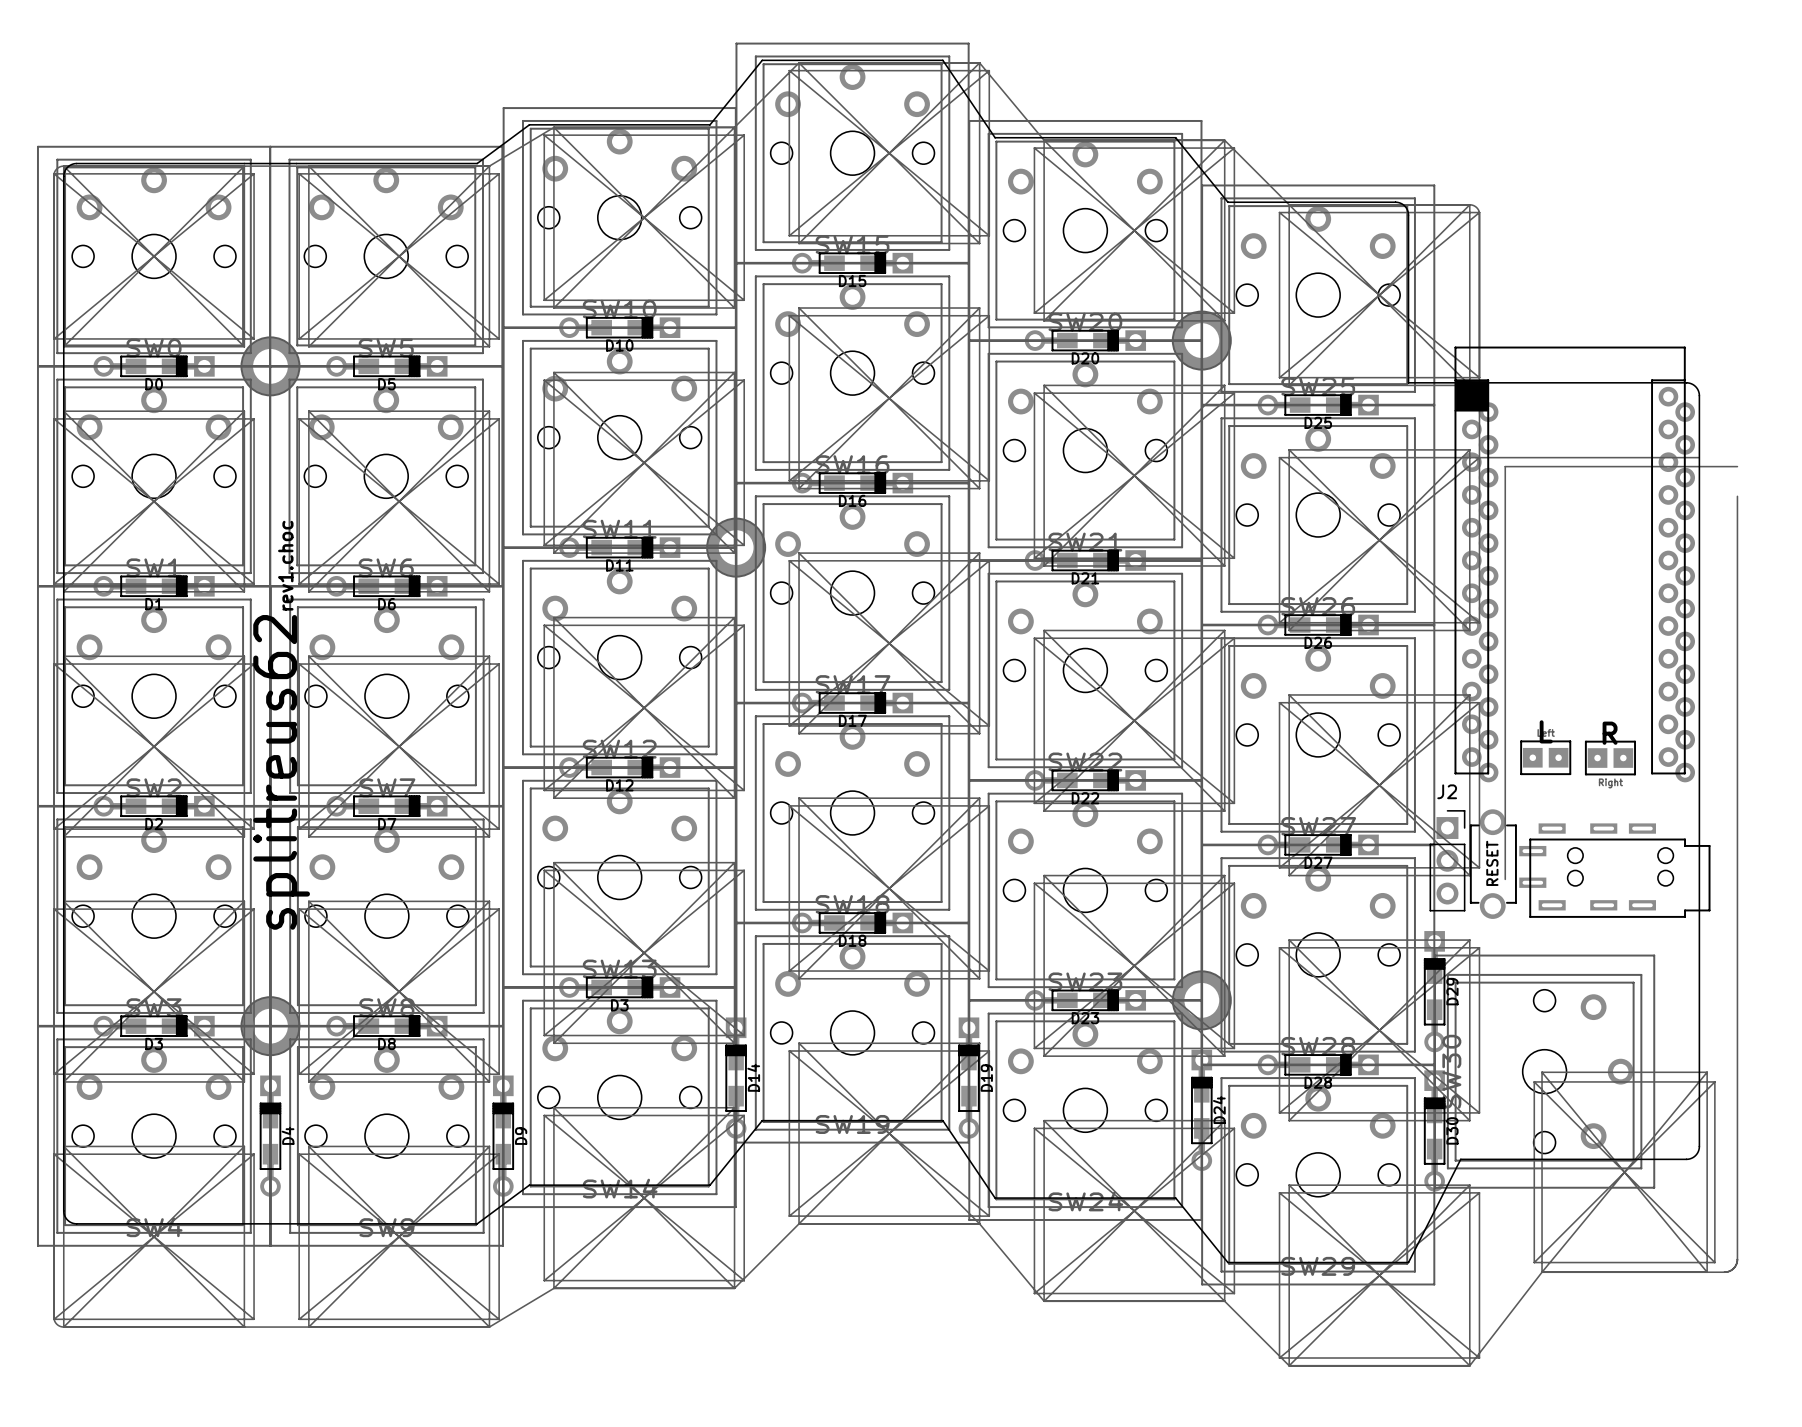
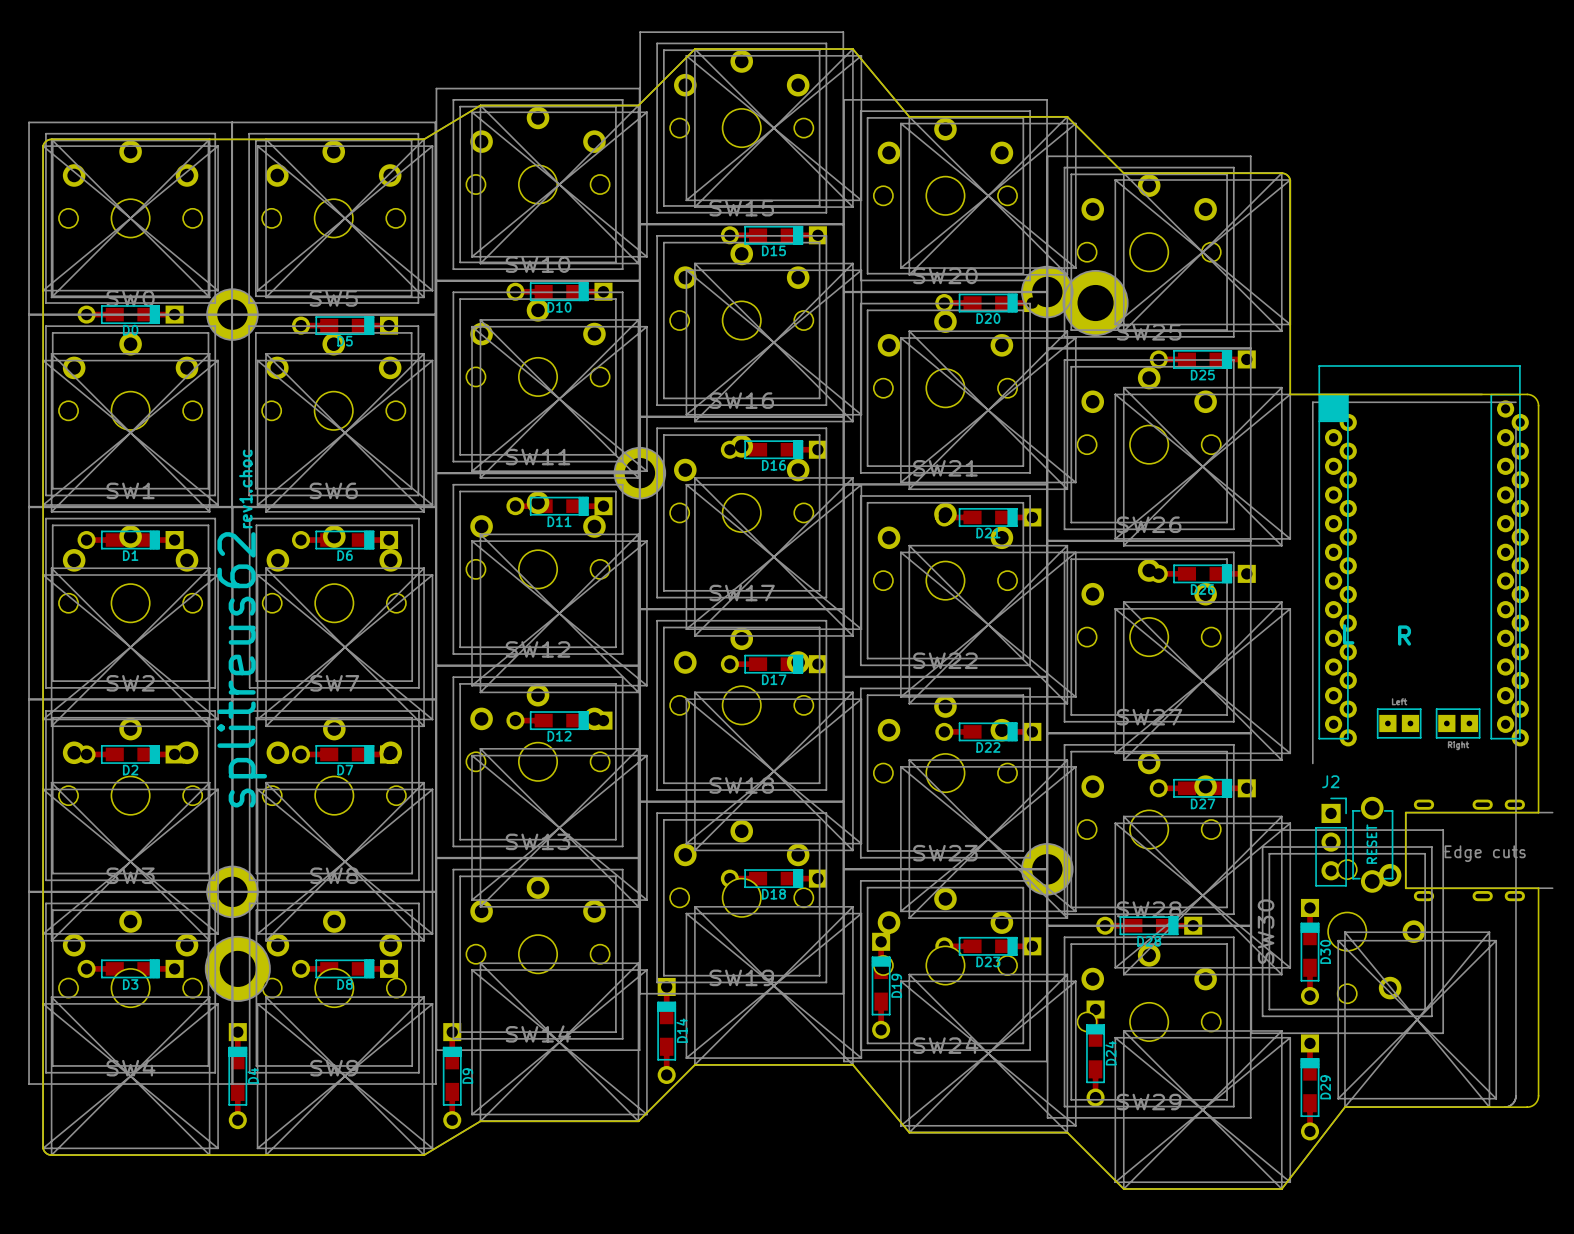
board edge: (762, 60) (710, 124) (529, 124) (477, 163) (76, 163) (70, 165) (65, 169) (63, 176) (63, 1210) (66, 1218) (76, 1223) (477, 1223) (529, 1185) (710, 1185) (762, 1120) (942, 1120) (995, 1198) (1175, 1198) (1227, 1262) (1408, 1262) (1460, 1159) (1686, 1159) (1694, 1156) (1699, 1146) (1699, 395) (1696, 387) (1686, 382) (1408, 382) (1408, 215) (1406, 208) (1402, 203) (1395, 202) (1227, 202) (1175, 137) (995, 137) (942, 60) (762, 60) -> (694, 49) (638, 105) (480, 105) (424, 139) (51, 139) (44, 143) (43, 1148) (44, 1151) (51, 1155) (424, 1155) (480, 1121) (638, 1121) (694, 1064) (852, 1064) (909, 1132) (1067, 1132) (1123, 1188) (1281, 1188) (1344, 1107) (1527, 1107) (1534, 1104) (1538, 1095) (1538, 888) (1405, 888) (1405, 812) (1538, 812) (1538, 405) (1536, 398) (1527, 394) (1290, 394) (1290, 180) (1285, 174) (1123, 173) (1067, 116) (909, 116) (852, 49) (694, 49)
D15 position: (852, 263) -> (773, 235)
D10 position: (619, 327) -> (559, 291)
D20 position: (1085, 340) -> (988, 303)
part: none -> (1095, 303)
D5 position: (386, 366) -> (345, 325)
D25 position: (1318, 405) -> (1202, 359)
D16 position: (852, 483) -> (773, 449)
D11 position: (619, 547) -> (559, 506)
D21 position: (1085, 560) -> (988, 517)
part position: (1574, 564) -> (1423, 555)
D1 position: (154, 586) -> (130, 540)
D6 position: (386, 586) -> (345, 540)
D26 position: (1318, 625) -> (1202, 573)
D17 position: (852, 703) -> (773, 664)
part position: (1545, 757) -> (1399, 723)
part position: (1610, 758) -> (1458, 723)
D12 position: (619, 767) -> (559, 720)
D22 position: (1085, 780) -> (988, 731)
D2 position: (154, 806) -> (130, 754)
D7 position: (386, 806) -> (345, 754)
D27 position: (1318, 844) -> (1202, 788)
J2 position: (1447, 860) -> (1331, 842)
part position: (1493, 864) -> (1372, 844)
part: (1614, 870) -> none
D18 position: (852, 922) -> (773, 878)
part: none -> (1479, 850)
D3: (619, 987) -> none
D29 position: (1434, 991) -> (1310, 1087)
D23 position: (1085, 1000) -> (988, 946)
D3 position: (154, 1026) -> (130, 968)
D8 position: (386, 1026) -> (345, 968)
D14 position: (736, 1078) -> (666, 1030)
D19 position: (968, 1078) -> (881, 985)
D24 position: (1201, 1110) -> (1095, 1053)
part: none -> (237, 968)
D30 position: (1434, 1130) -> (1310, 951)
D4 position: (270, 1136) -> (237, 1076)
D9 position: (503, 1136) -> (452, 1076)

